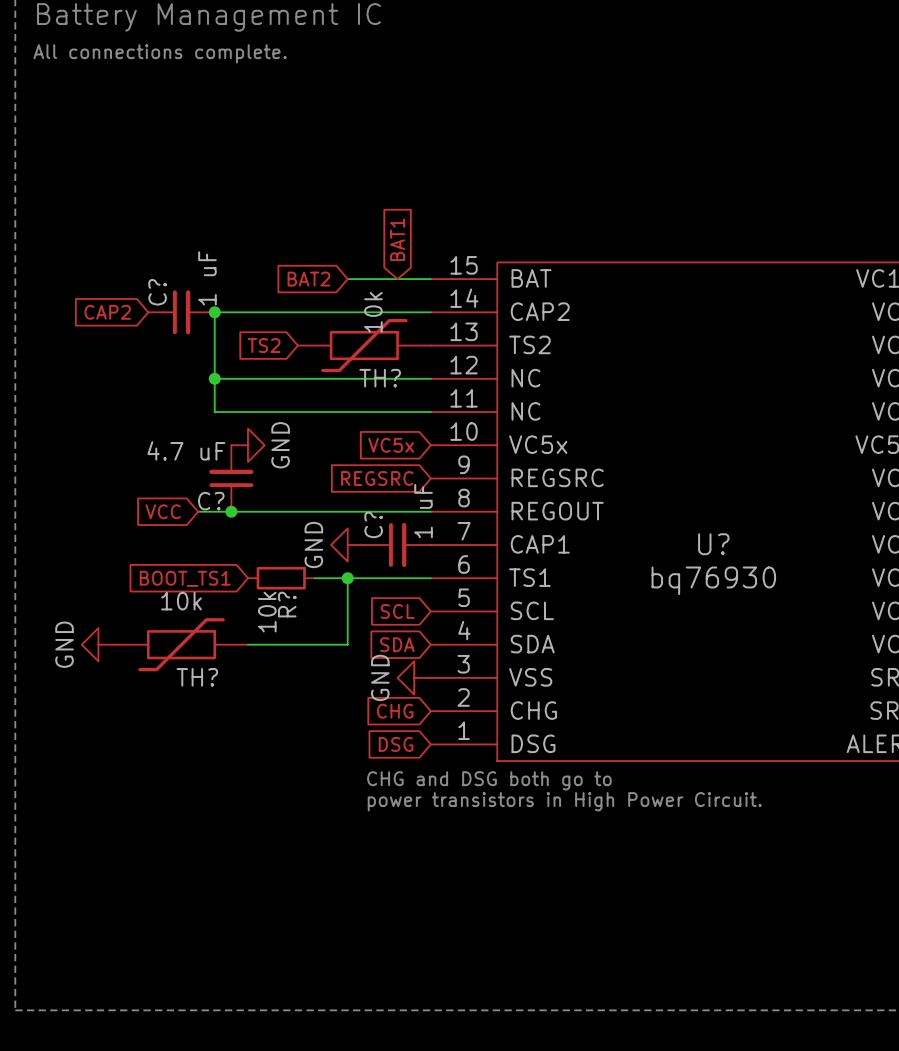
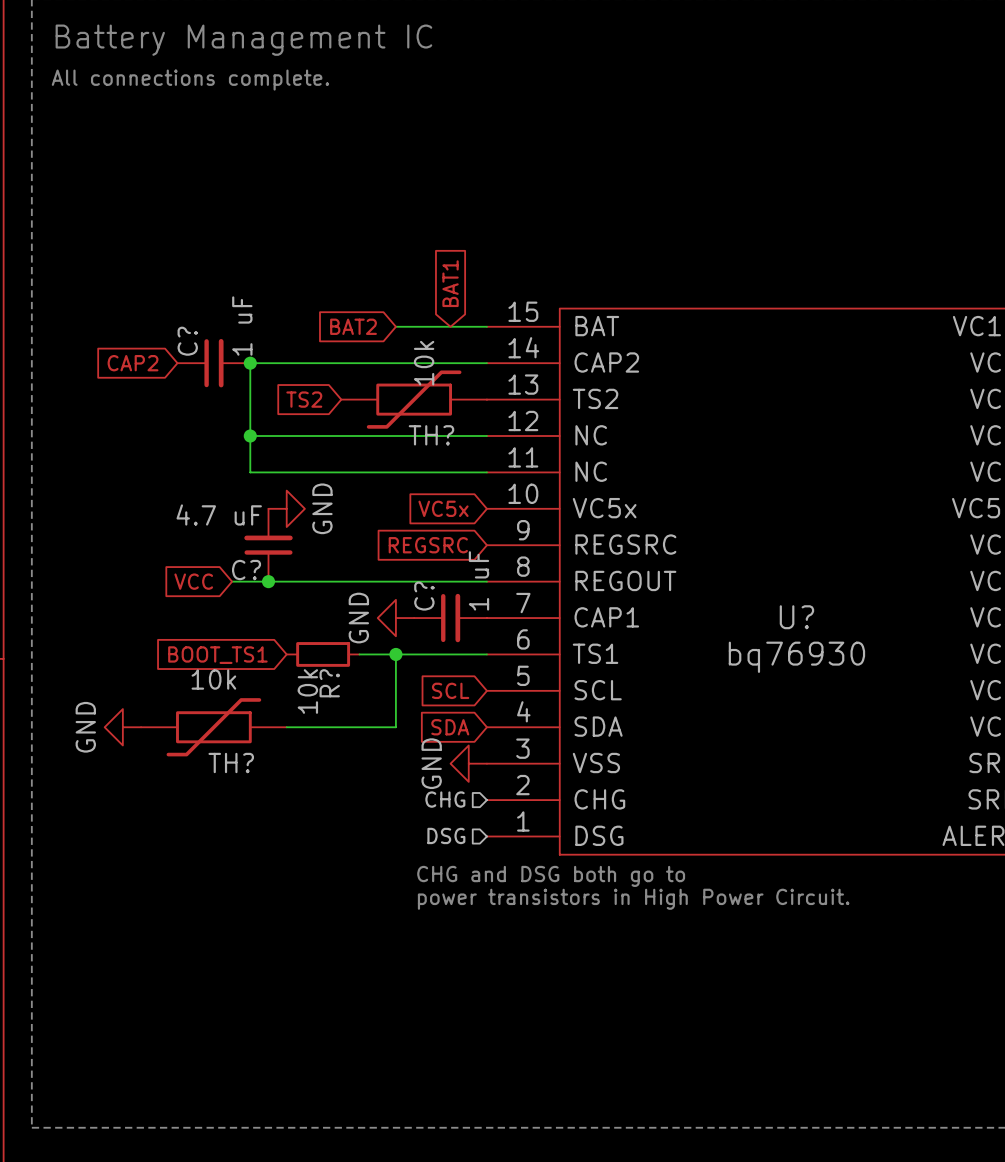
hierarchical label: none -> CHG (445, 799)
global label: CHG (395, 711) -> none
hierarchical label: none -> DSG (446, 835)
global label: DSG (396, 744) -> none

